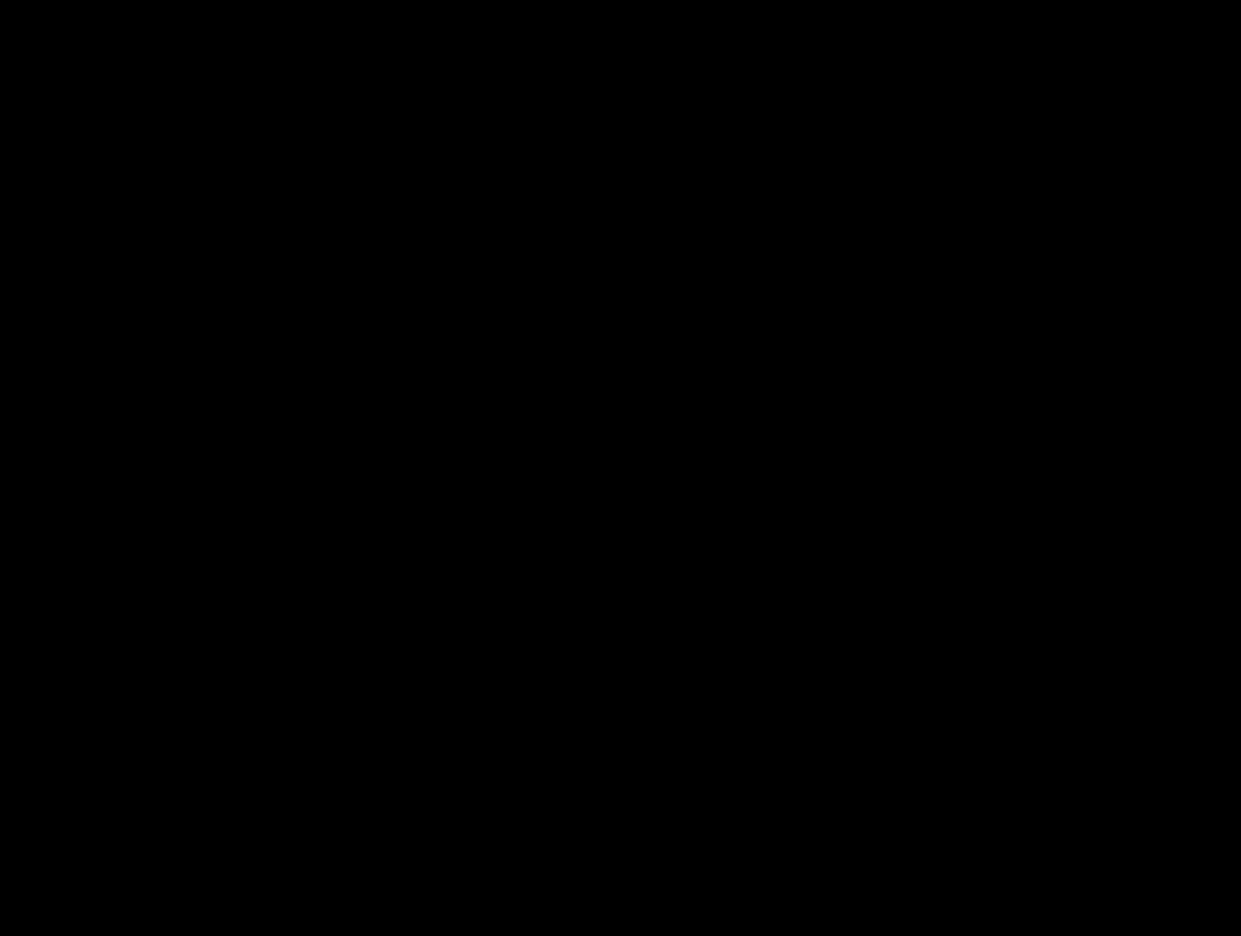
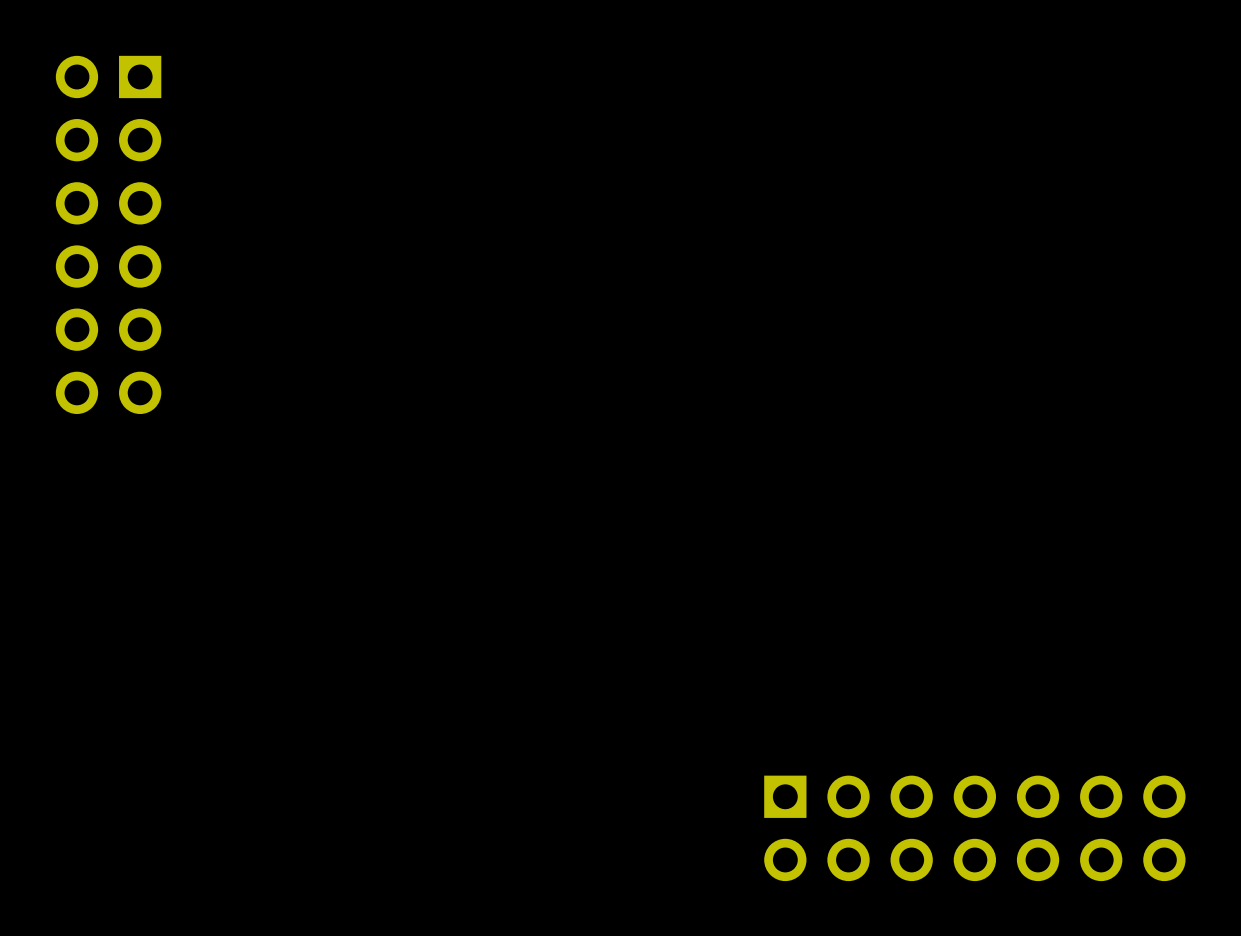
part: none -> (108, 234)
part: none -> (974, 828)

